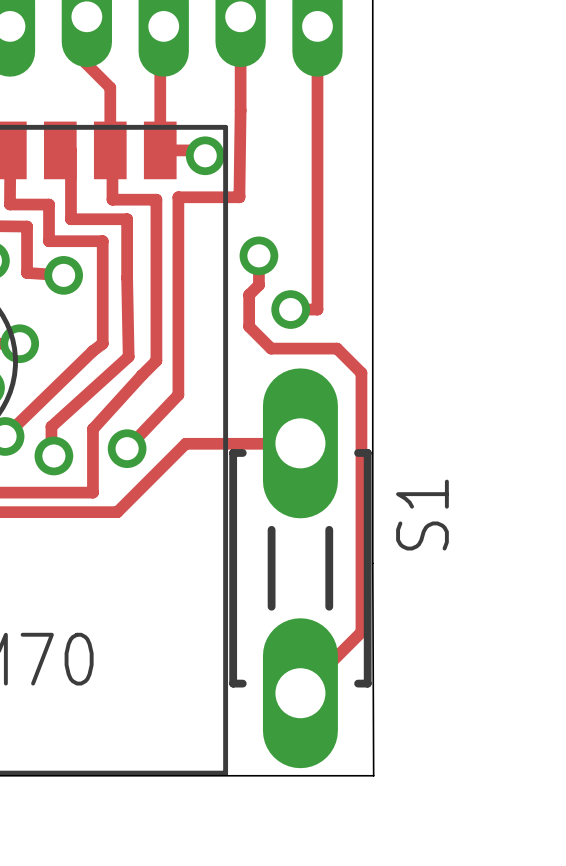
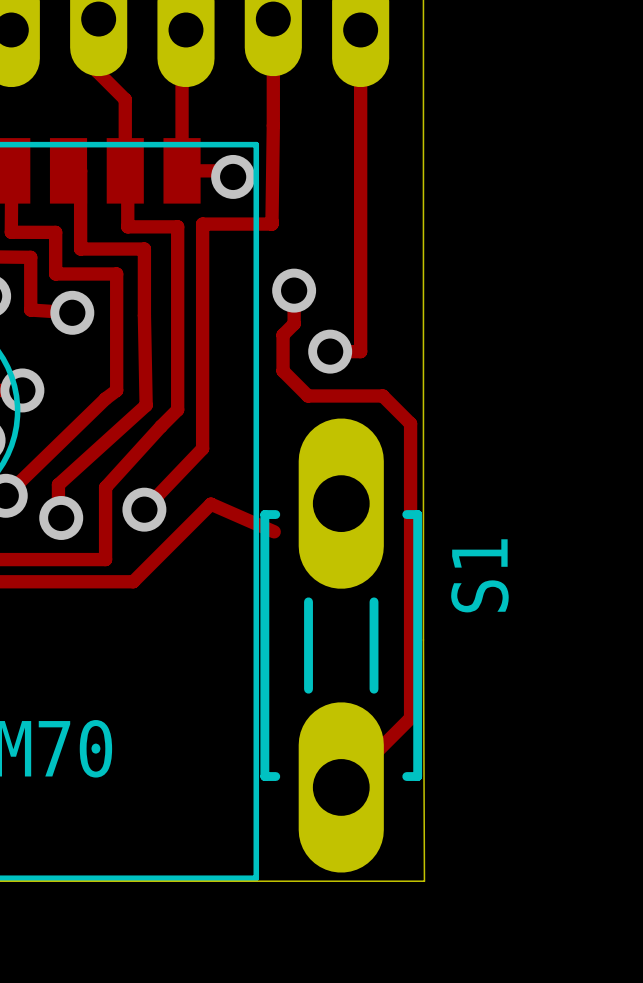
track: (185, 443) (299, 443) -> (210, 504) (274, 531)

